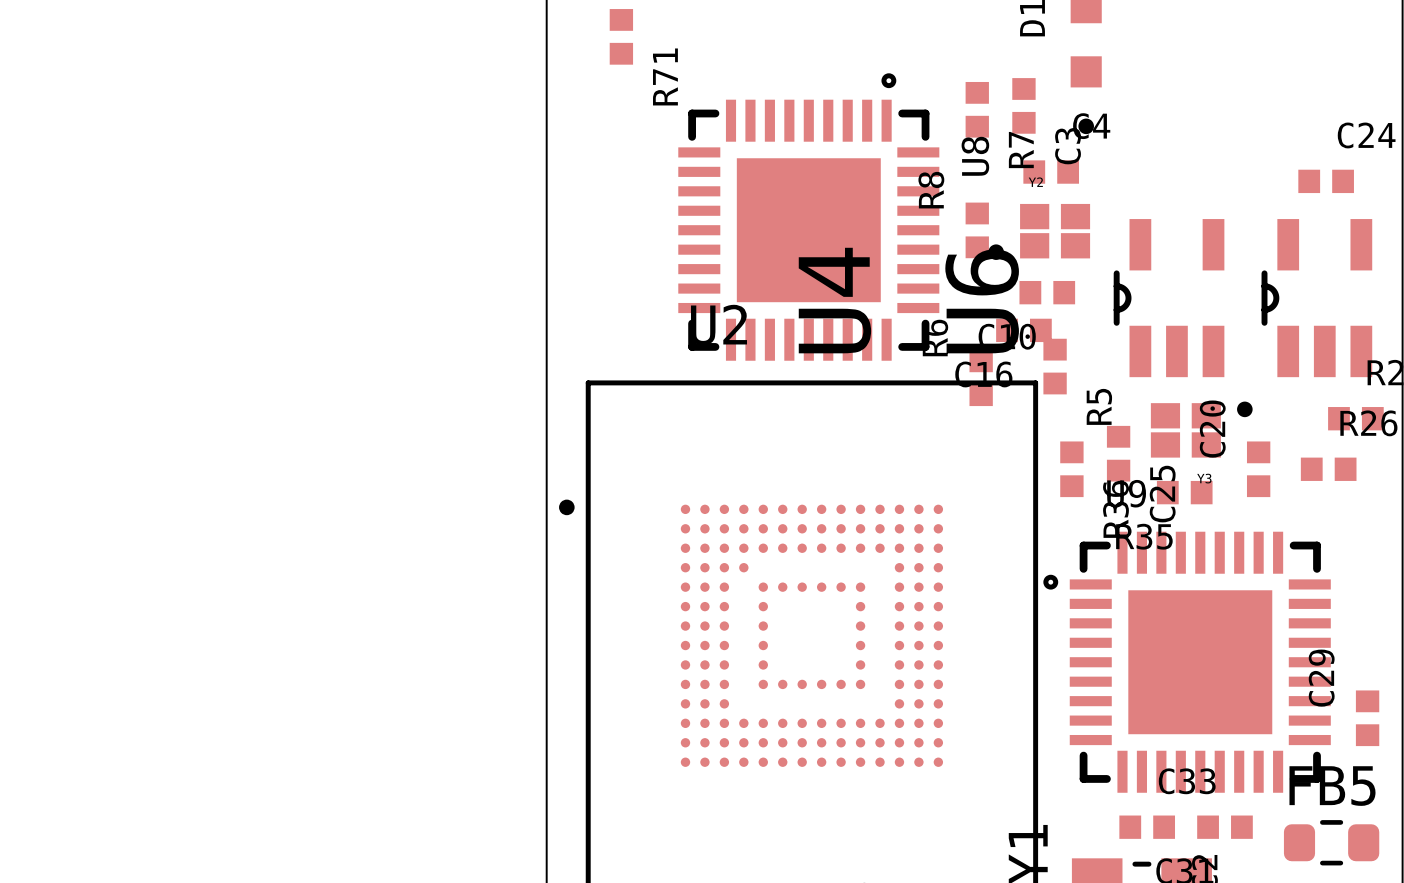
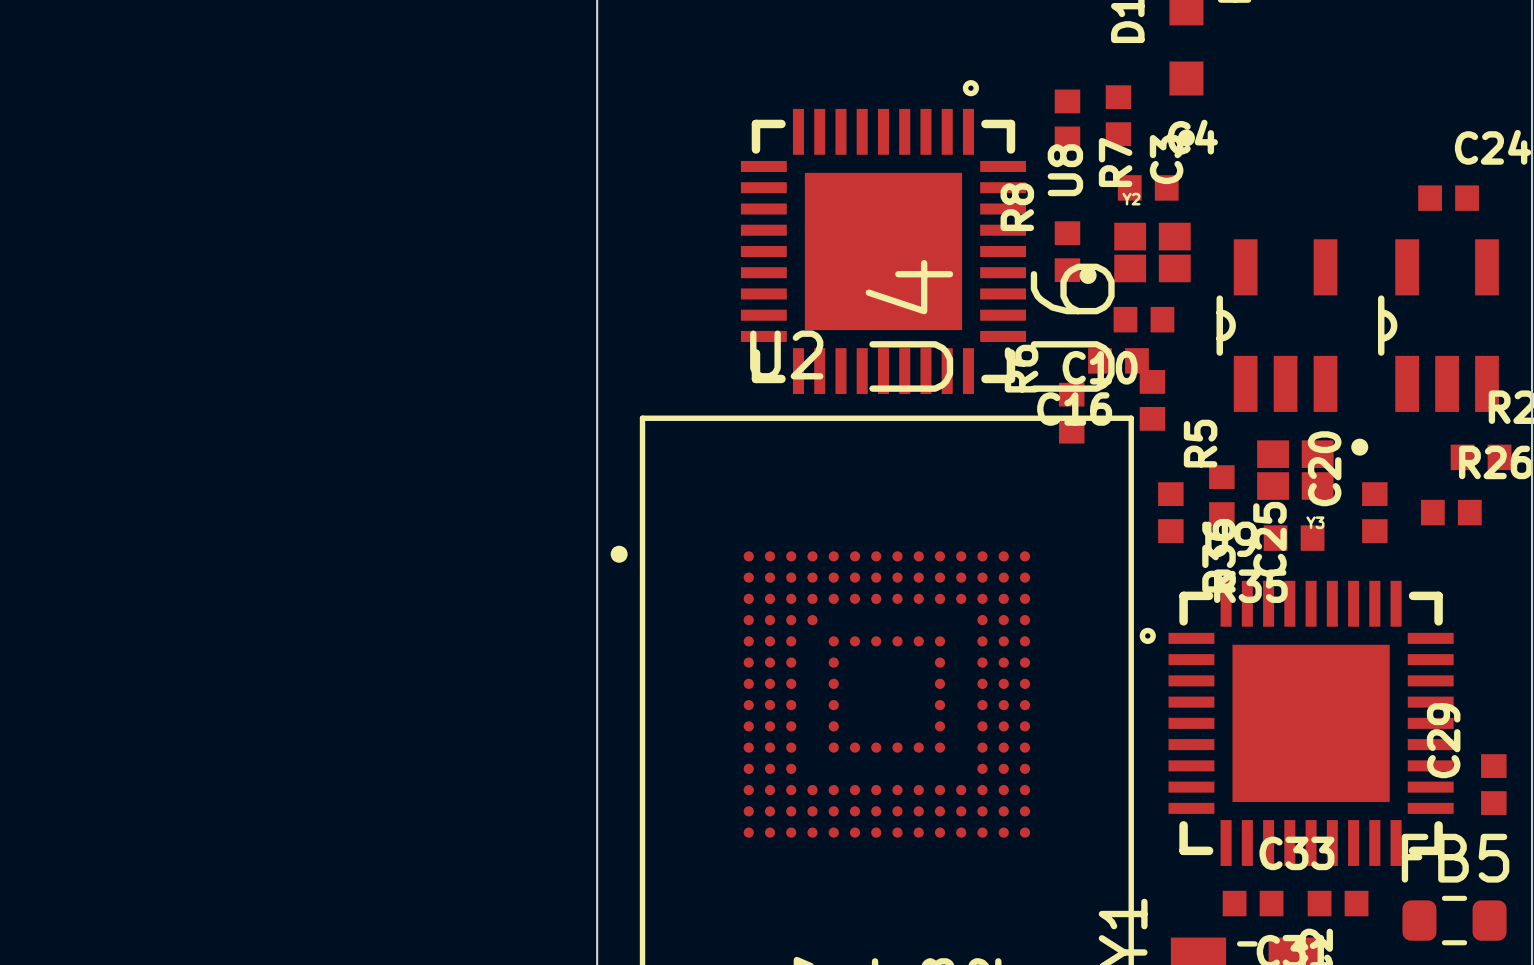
R71: (621, 36) -> none

